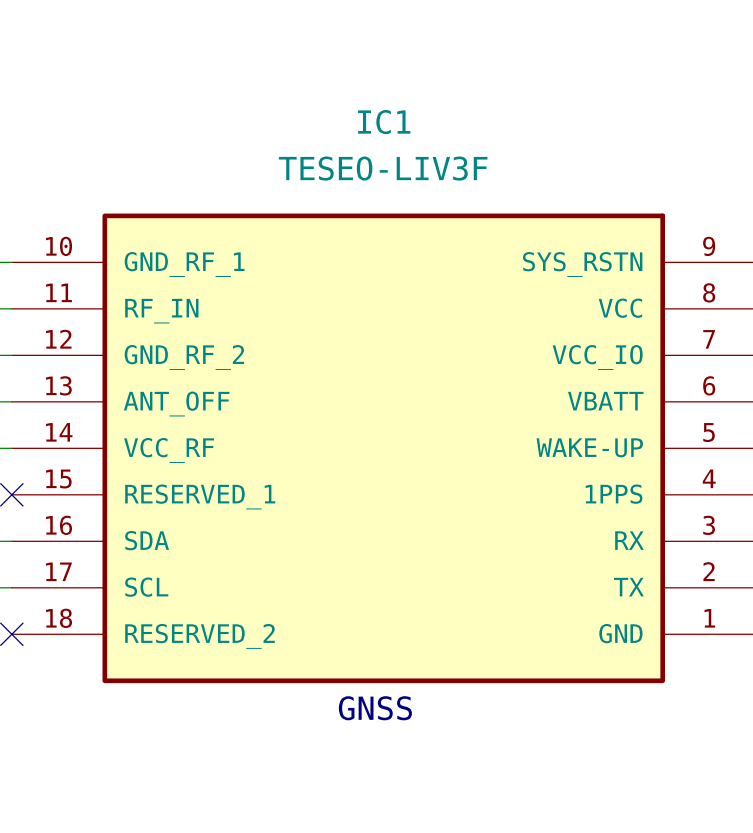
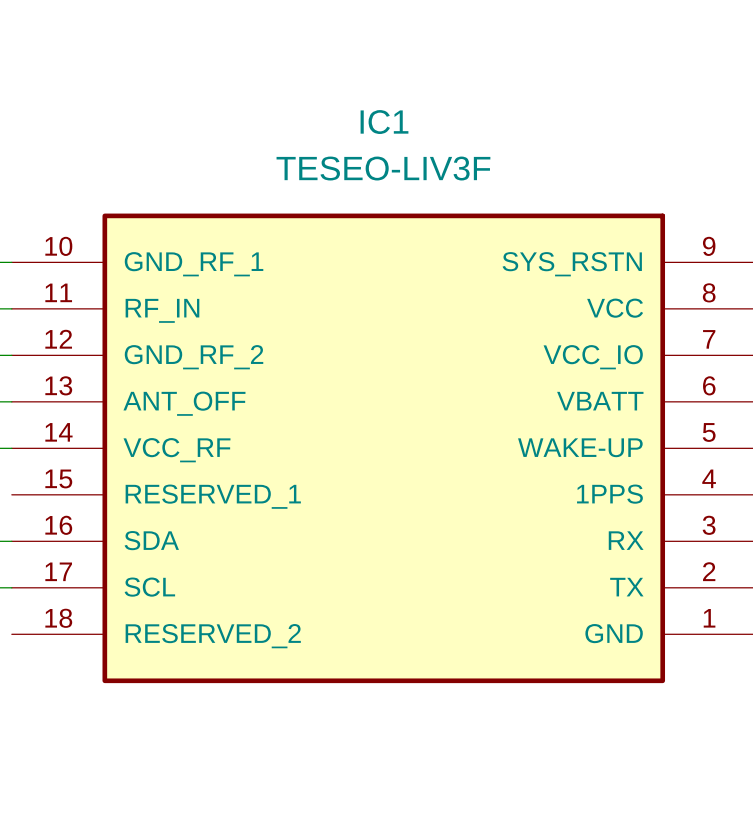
no-connect mark: (11, 494) -> none
no-connect mark: (11, 634) -> none
text: GNSS (375, 708) -> none

